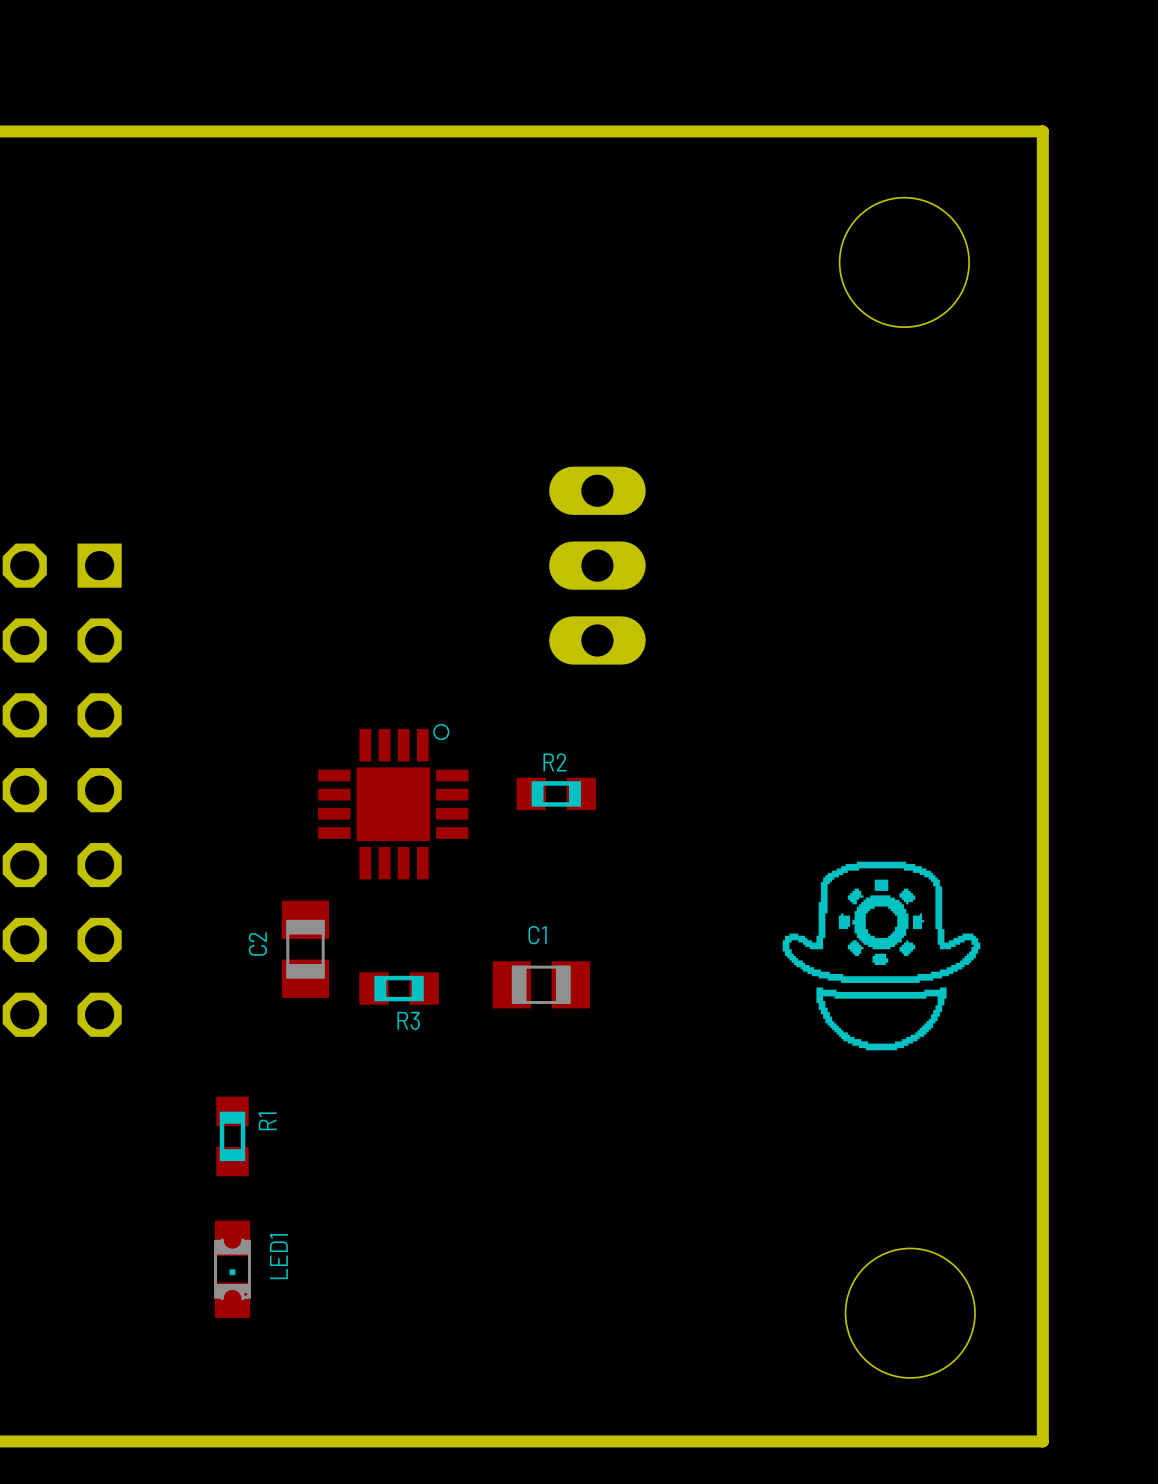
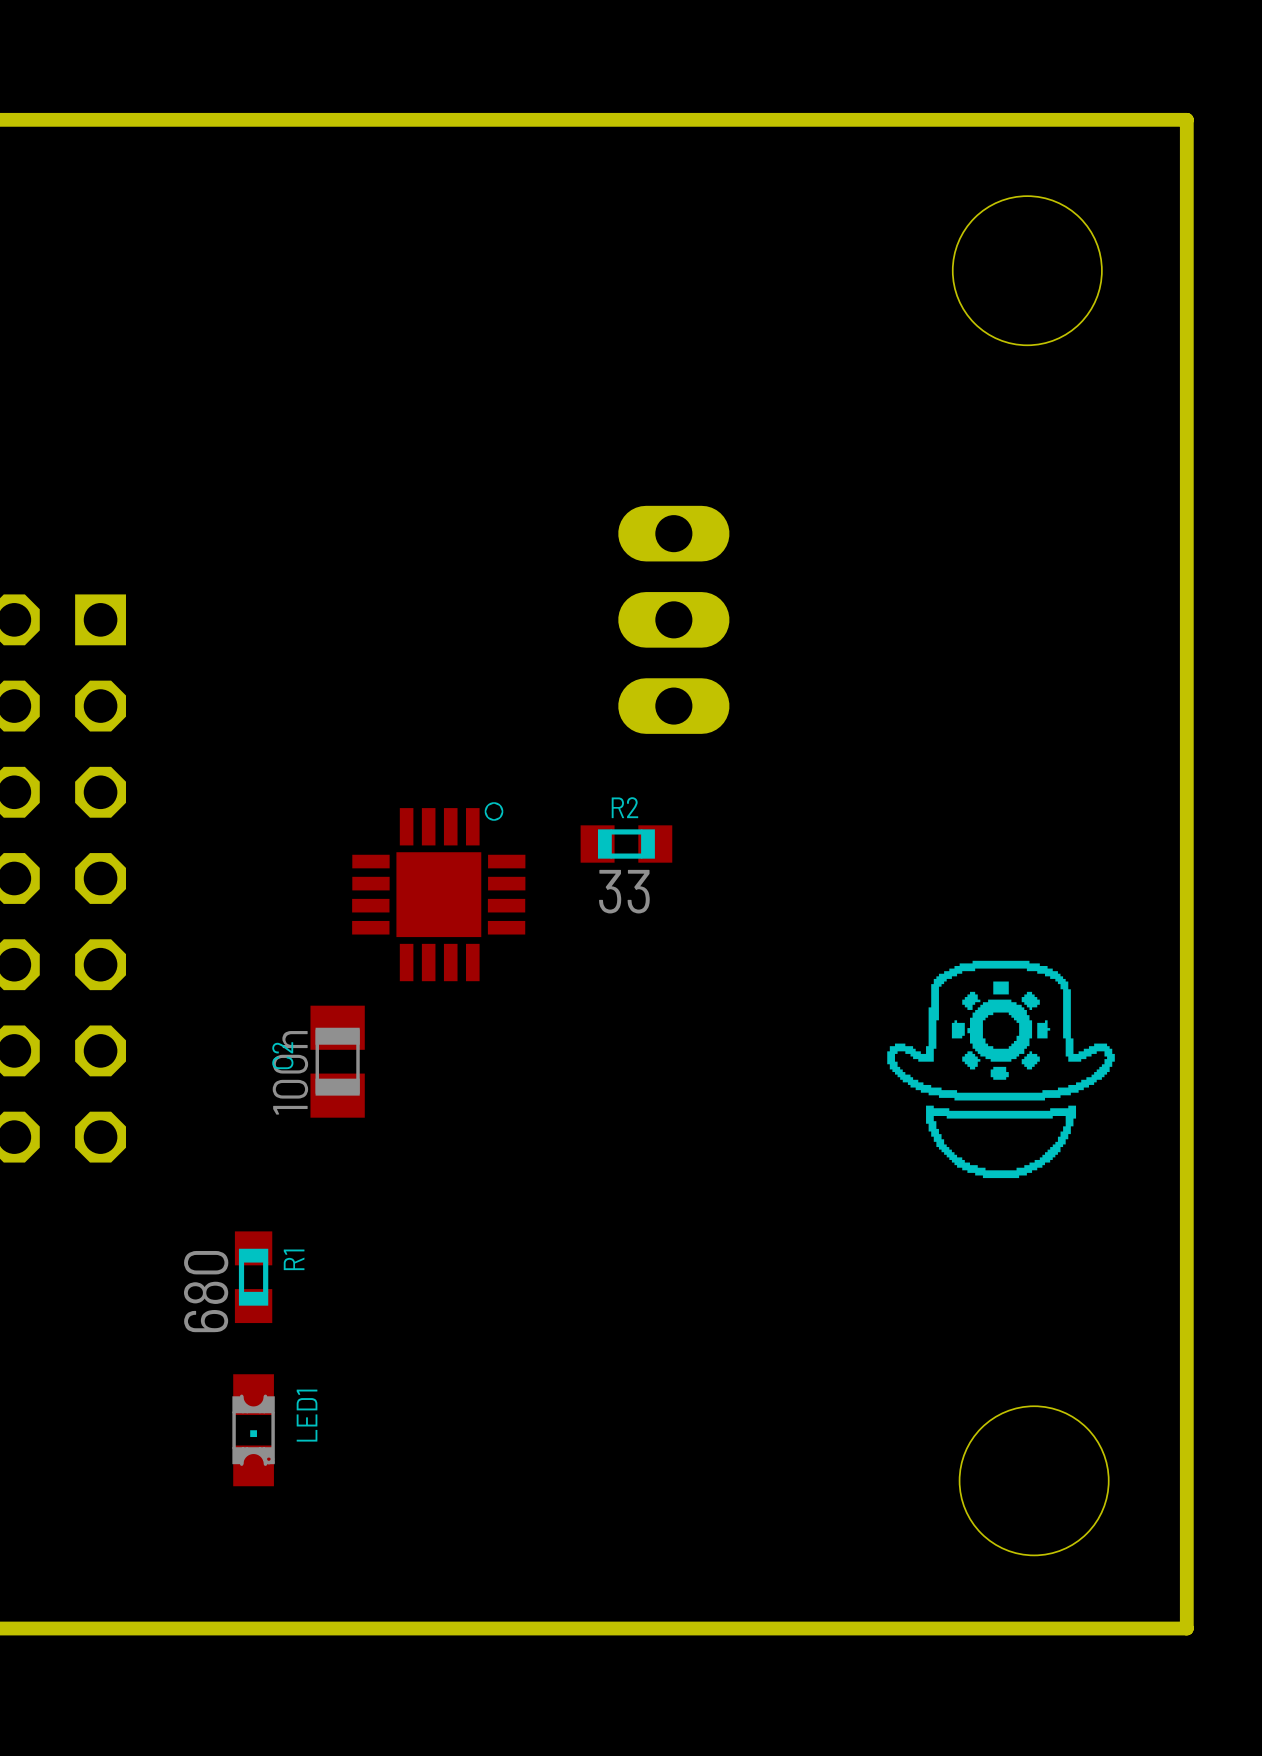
R2 position: (556, 793) -> (626, 844)
R2 value: none -> 33 (624, 891)
C2 value: none -> 100n (290, 1072)
C1: (541, 984) -> none
R3: (399, 988) -> none
R1 value: none -> 680 (206, 1291)

